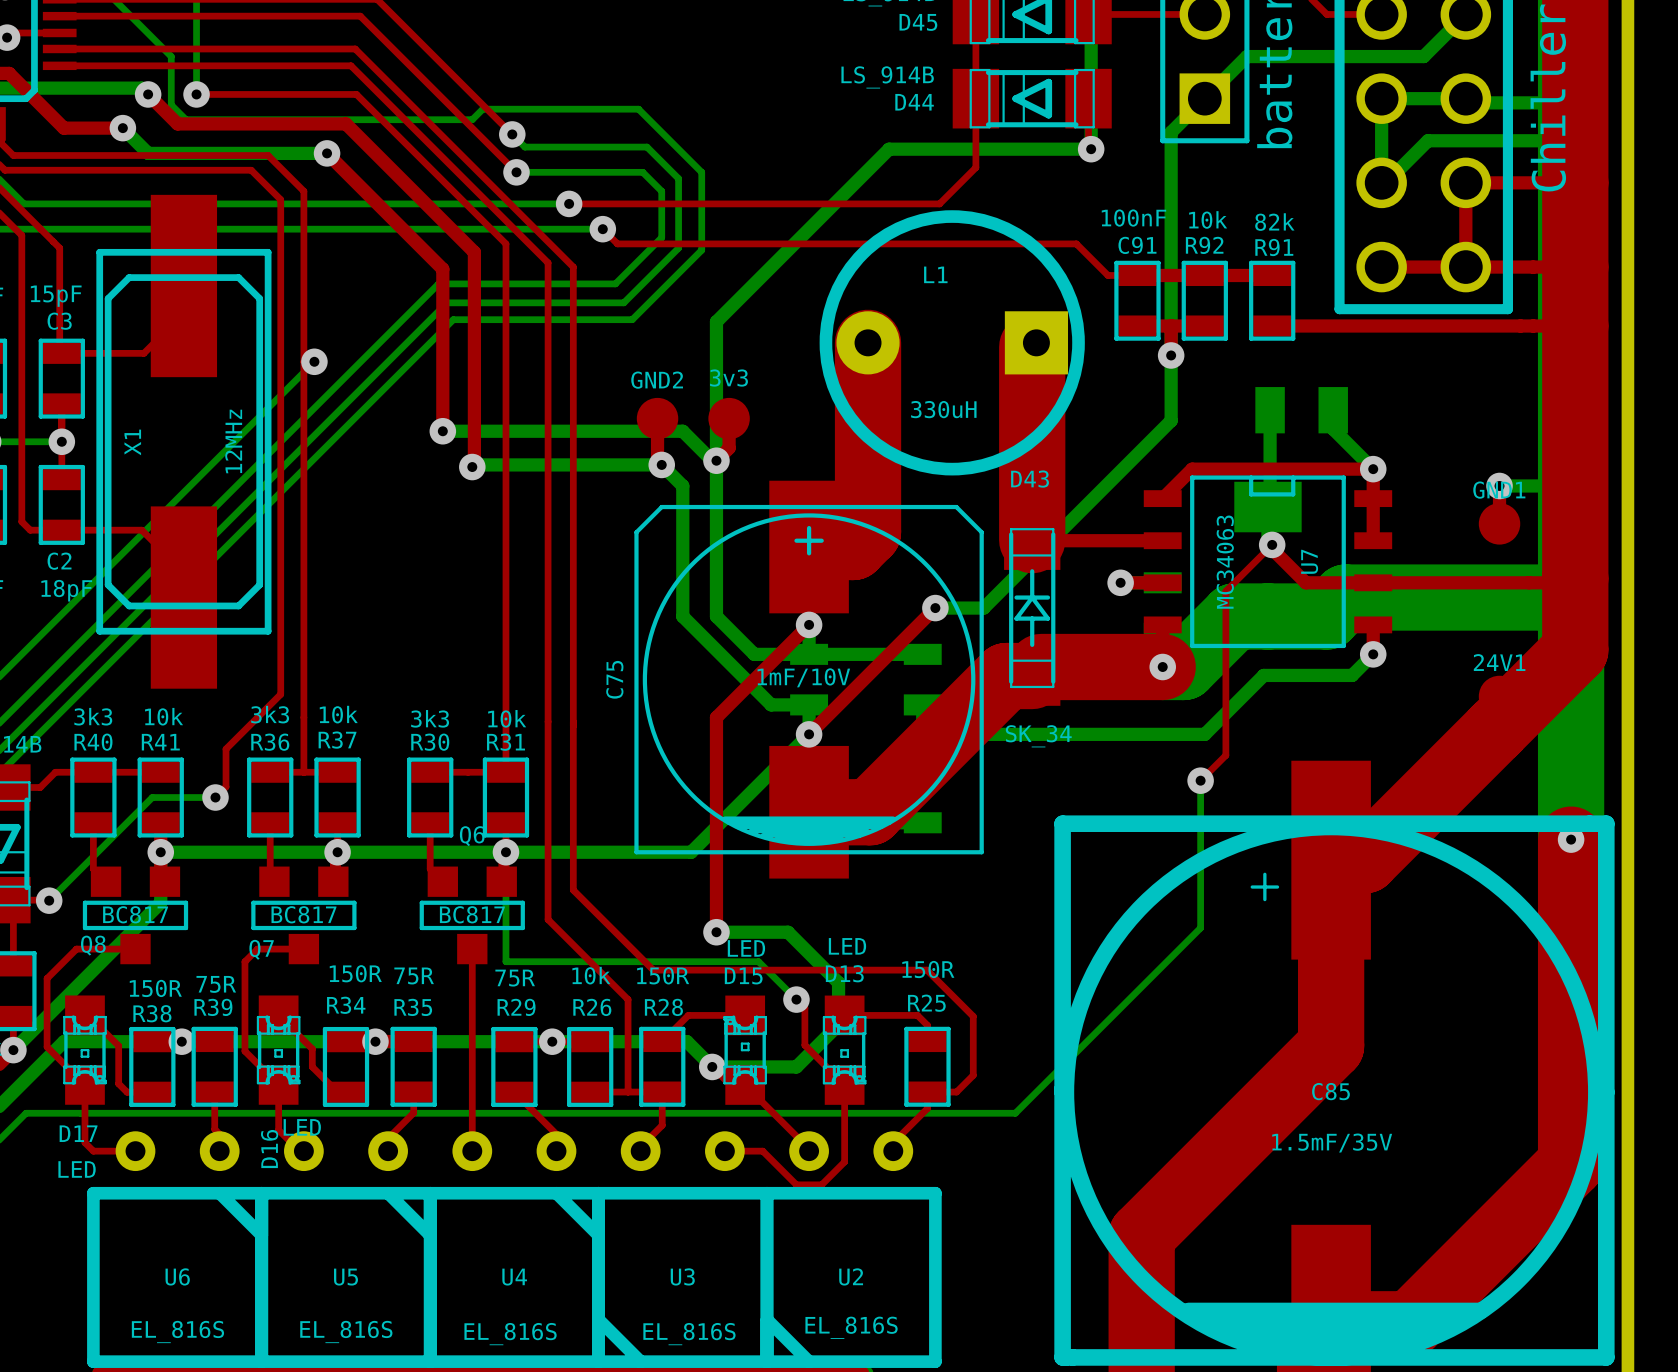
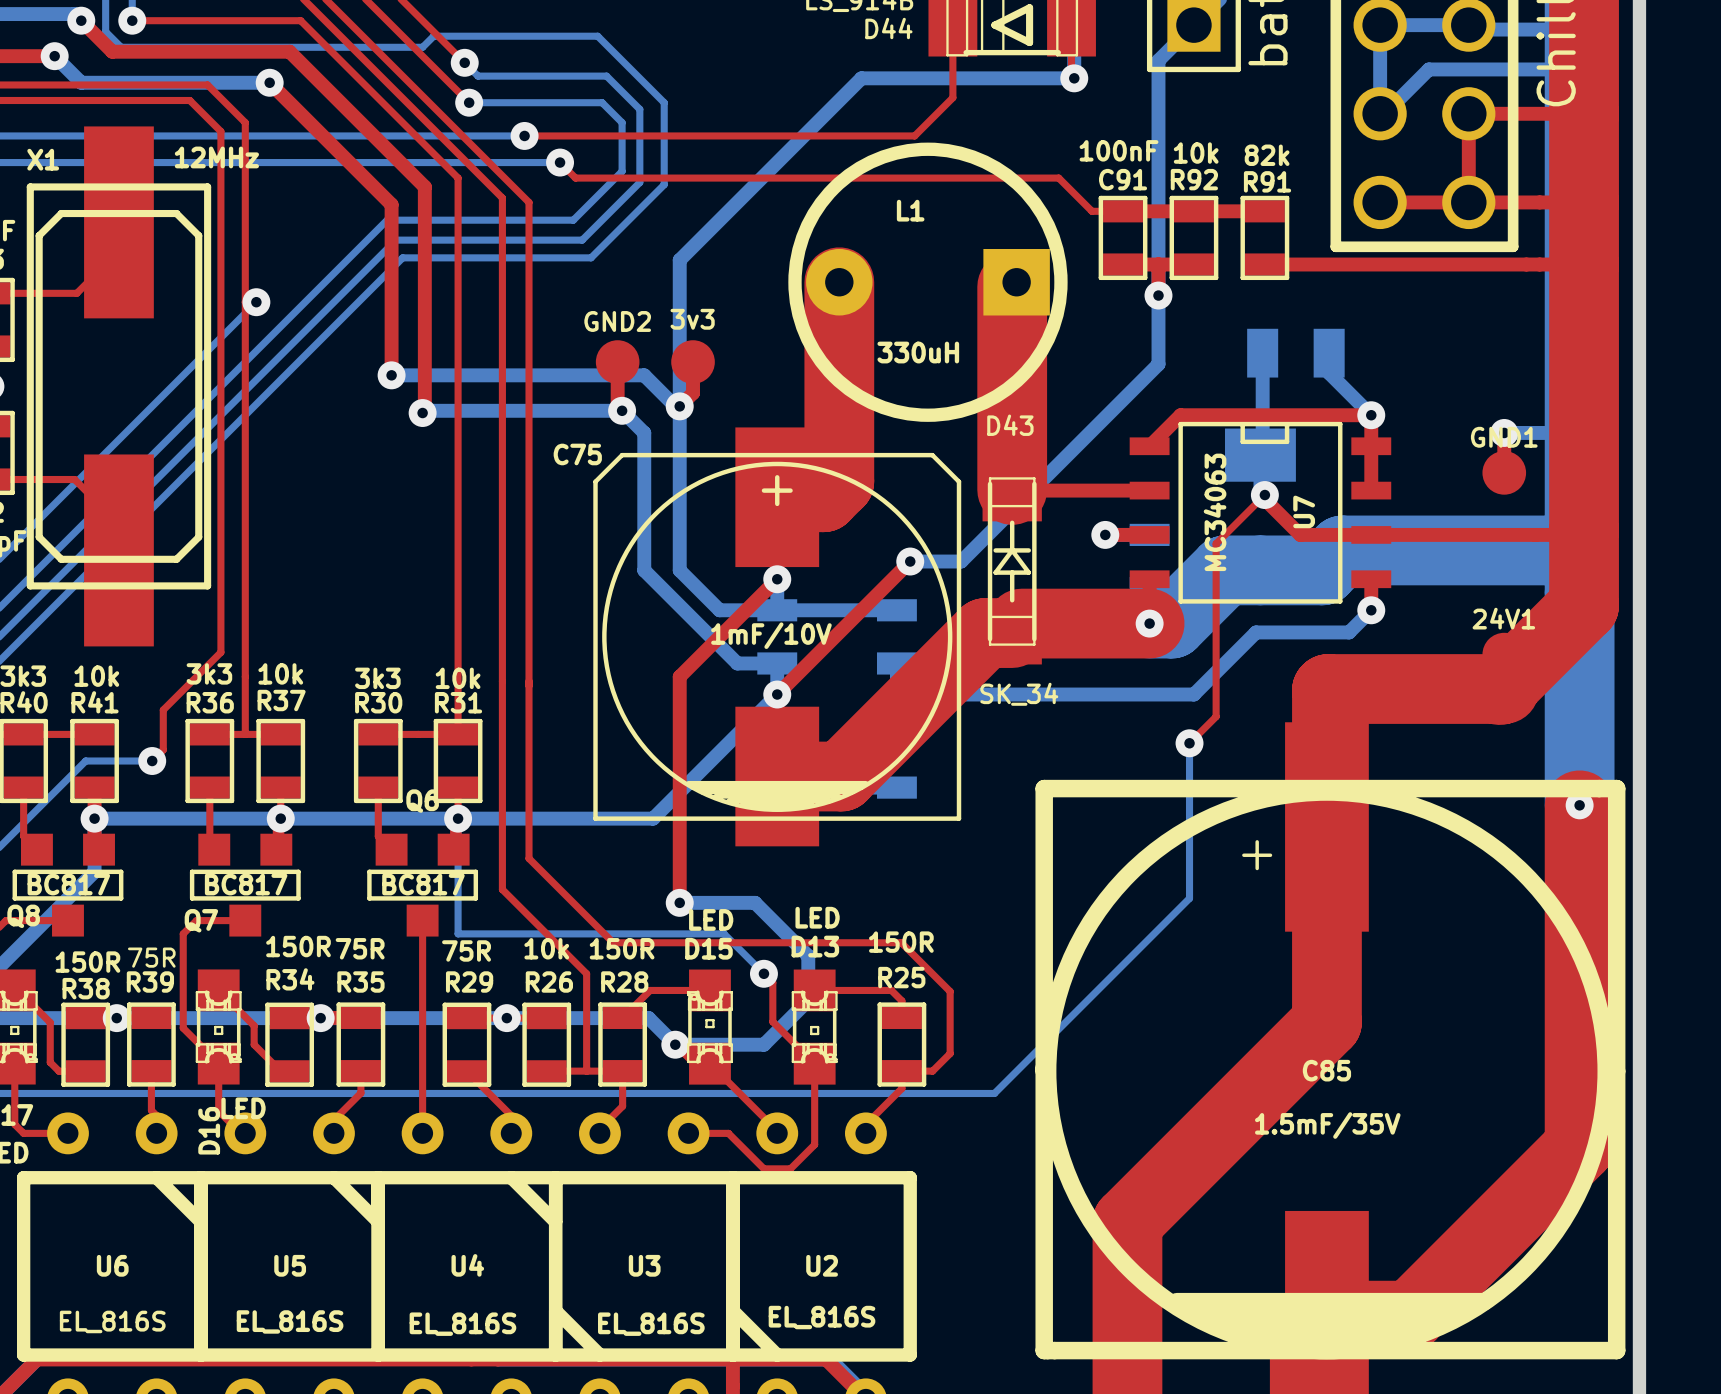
X1 value rotation: 0° (233, 441) -> 90° clockwise (216, 157)
X1 value position: 12MHz (233, 441) -> 12MHz (216, 157)
X1 name rotation: 0° (132, 442) -> 90° clockwise (43, 159)
X1 name position: X1 (132, 442) -> X1 (43, 159)
C75 name rotation: 0° (614, 679) -> 90° clockwise (577, 454)
C75 name position: C75 (614, 679) -> C75 (577, 454)
top track: (1495, 730) (1365, 860) (1331, 860) -> (1504, 685) (1504, 689) (1328, 689) (1326, 826)

